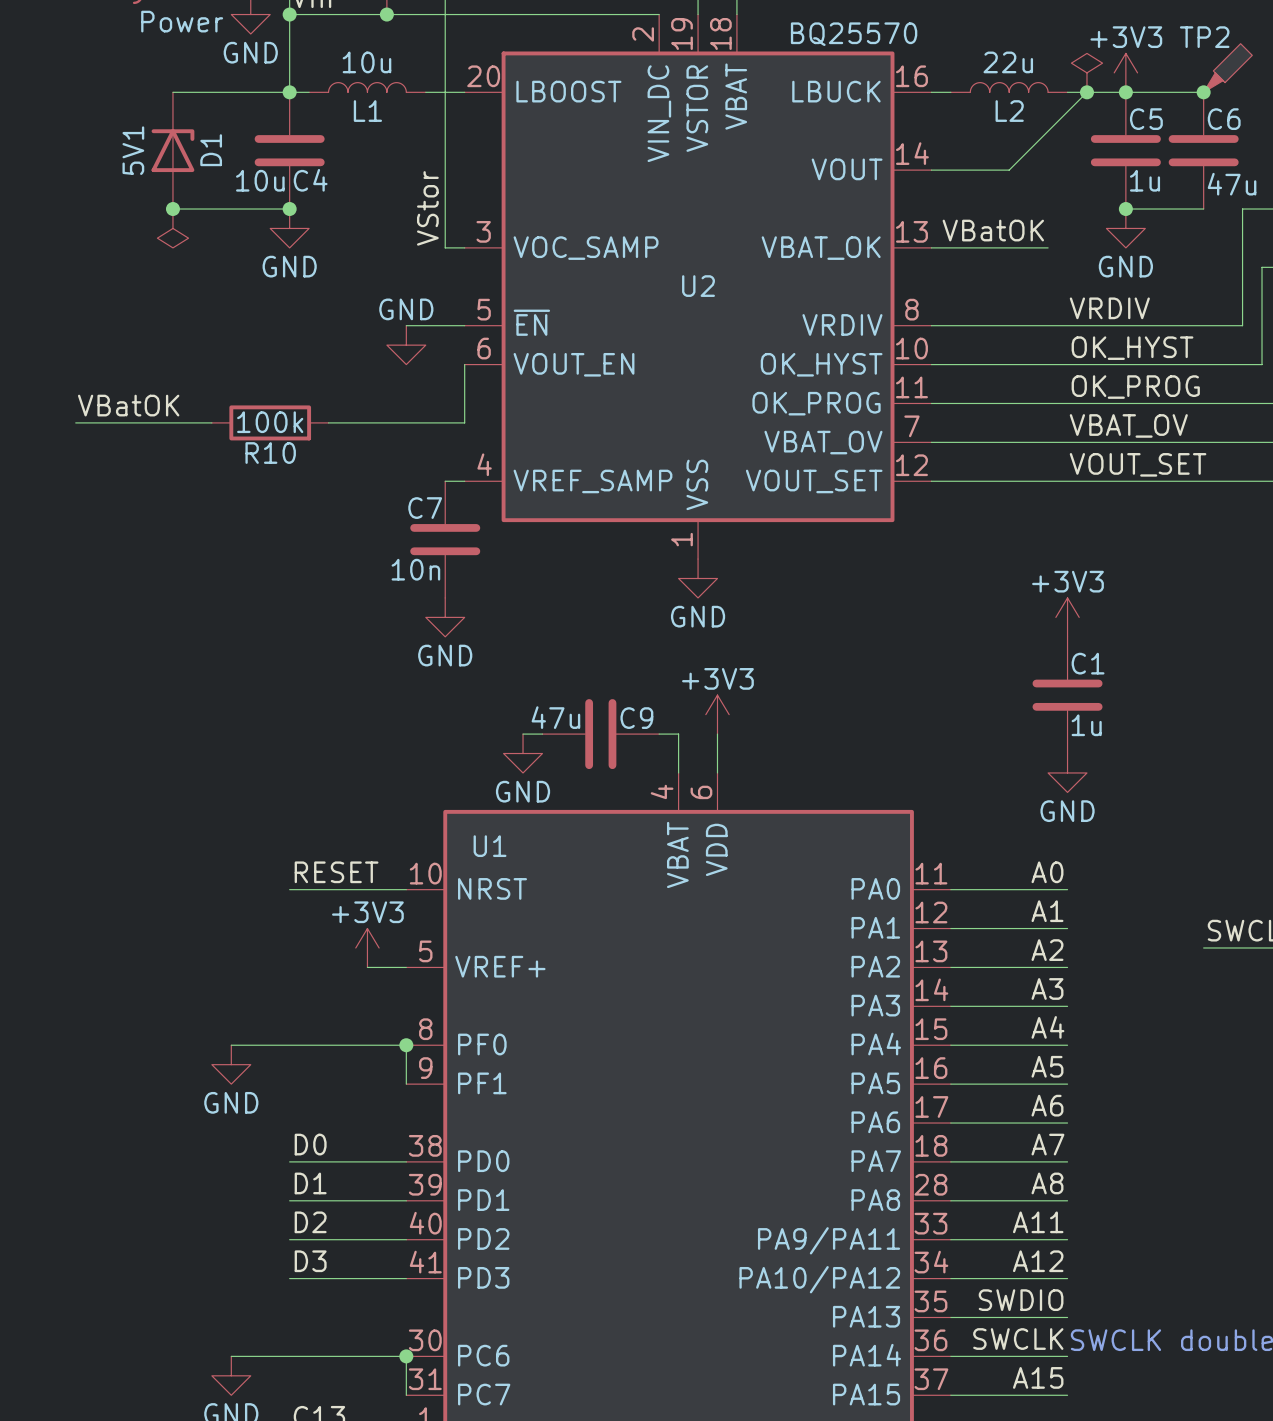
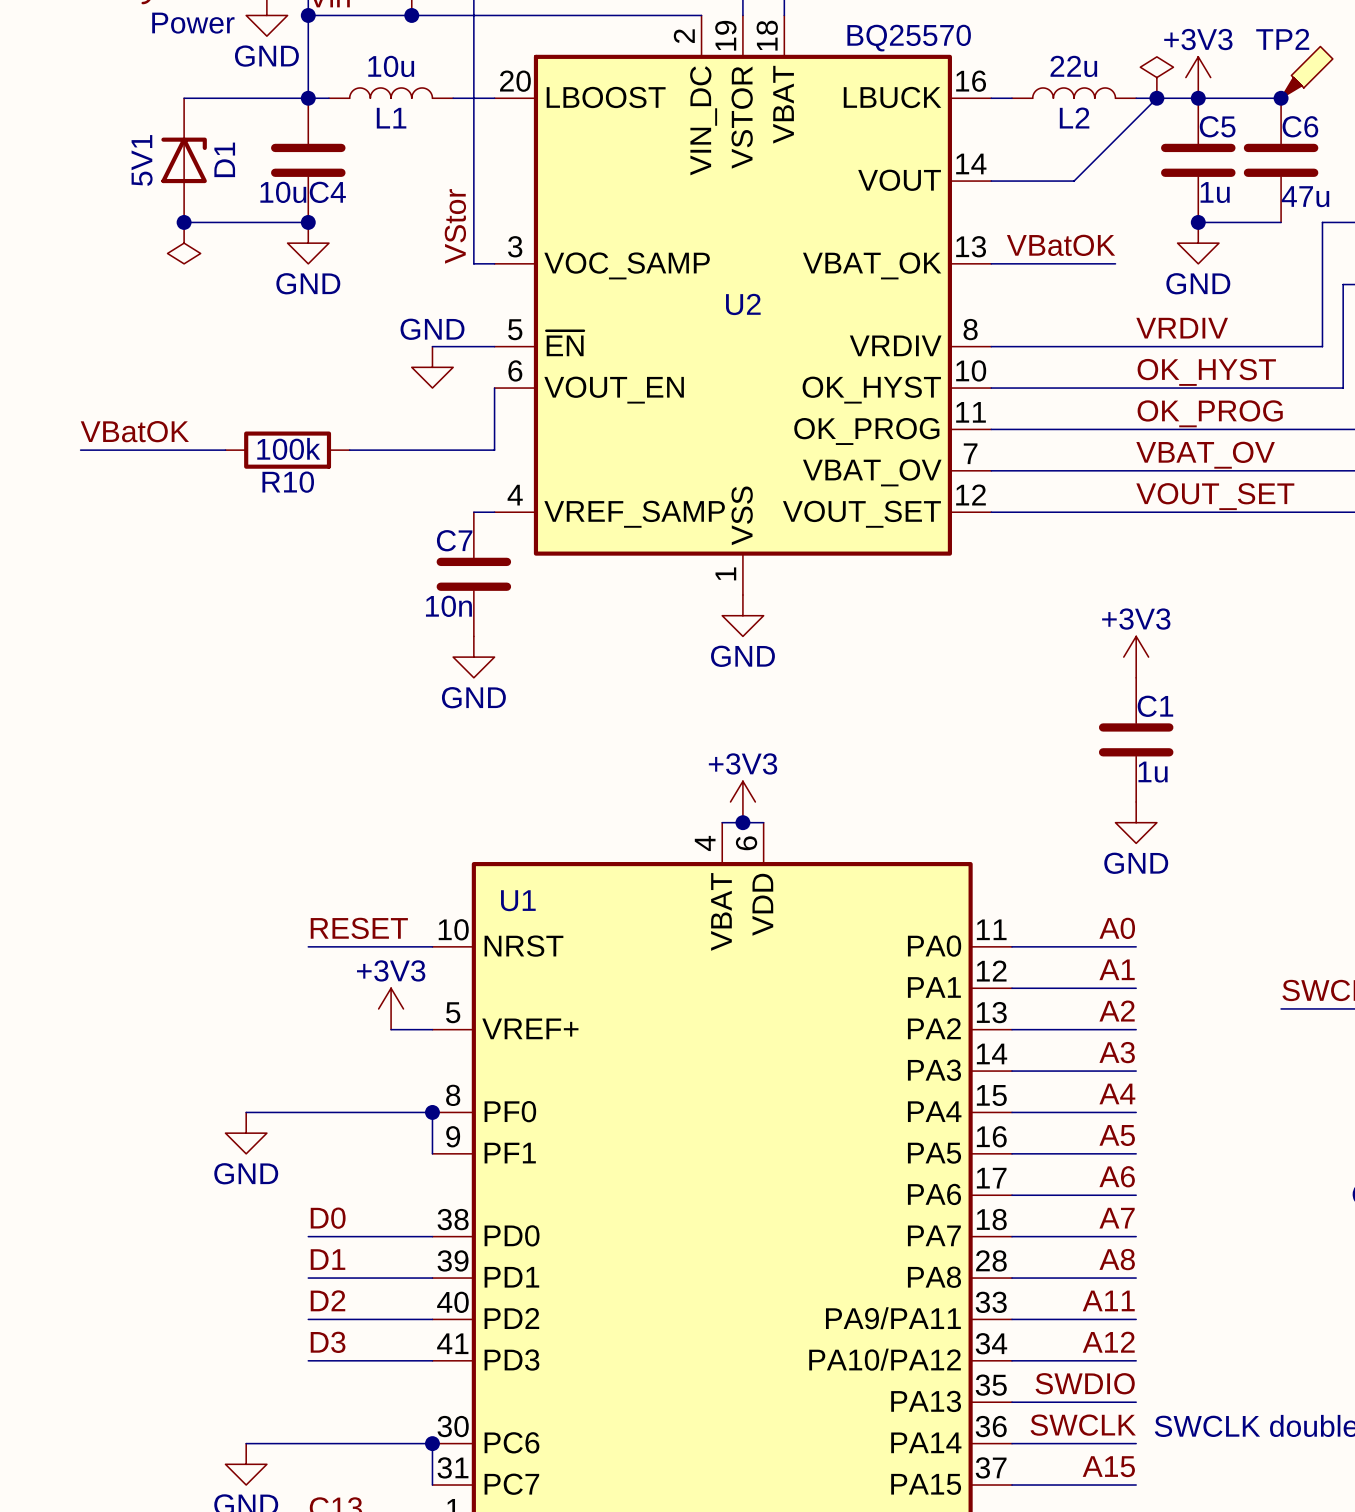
power symbol position: +3V3 (717, 714) -> +3V3 (742, 801)
wire: (523, 734) (542, 734) -> none
C9: 47u (600, 734) -> none
wire: (659, 734) (678, 734) (678, 772) -> none
wire: (717, 734) (717, 772) -> (722, 822) (763, 822)
power symbol: GND (523, 753) -> none
junction: none -> (742, 822)

